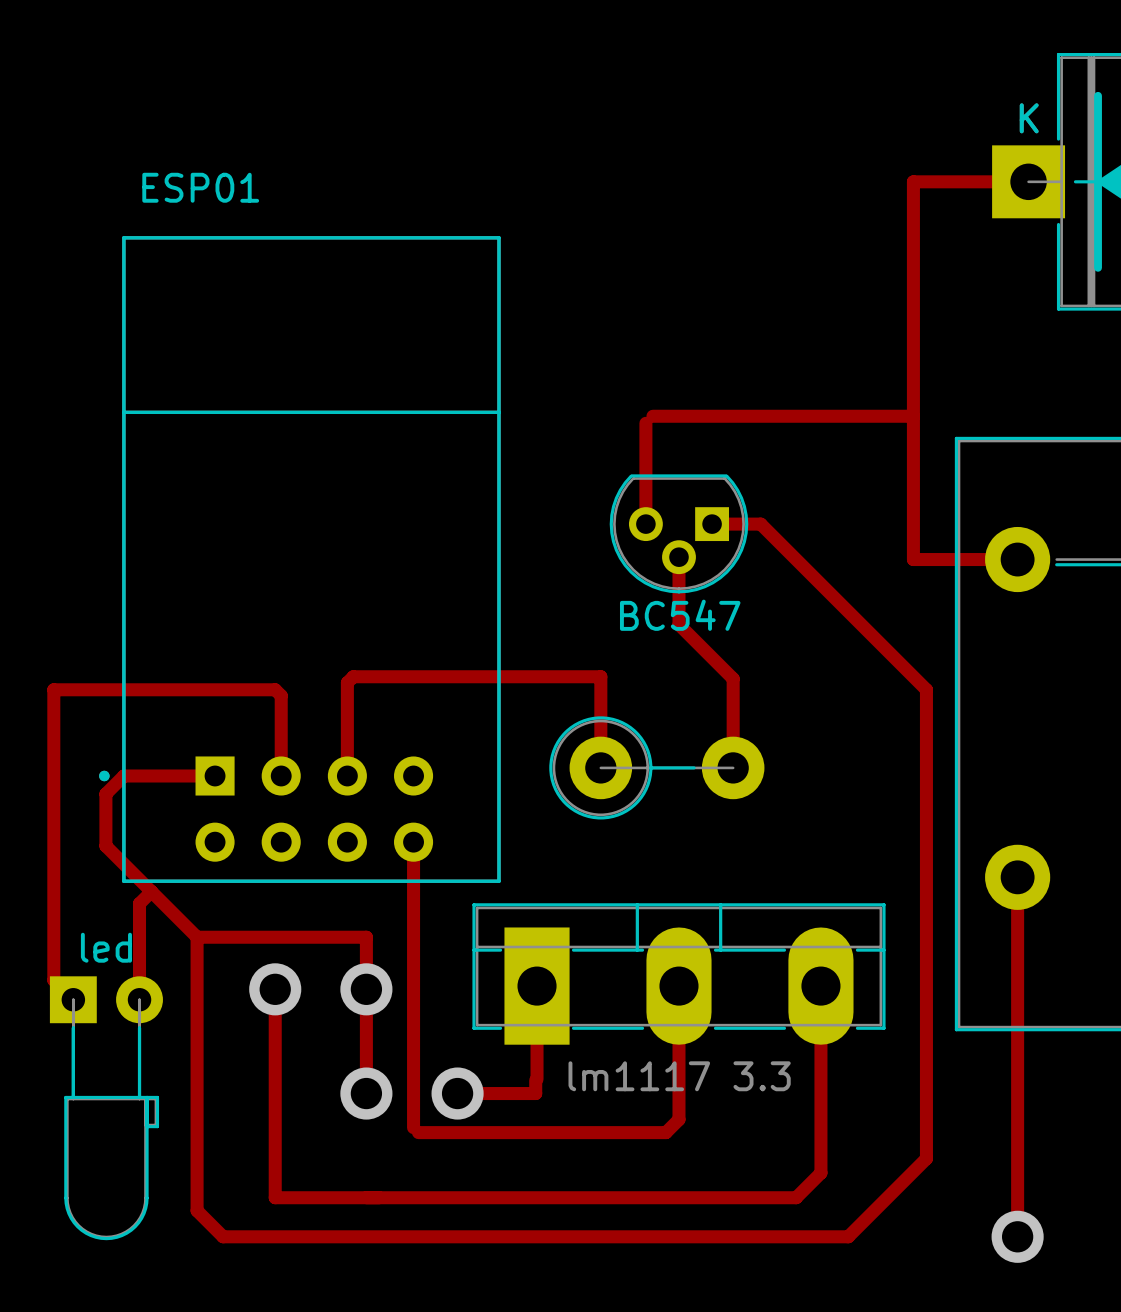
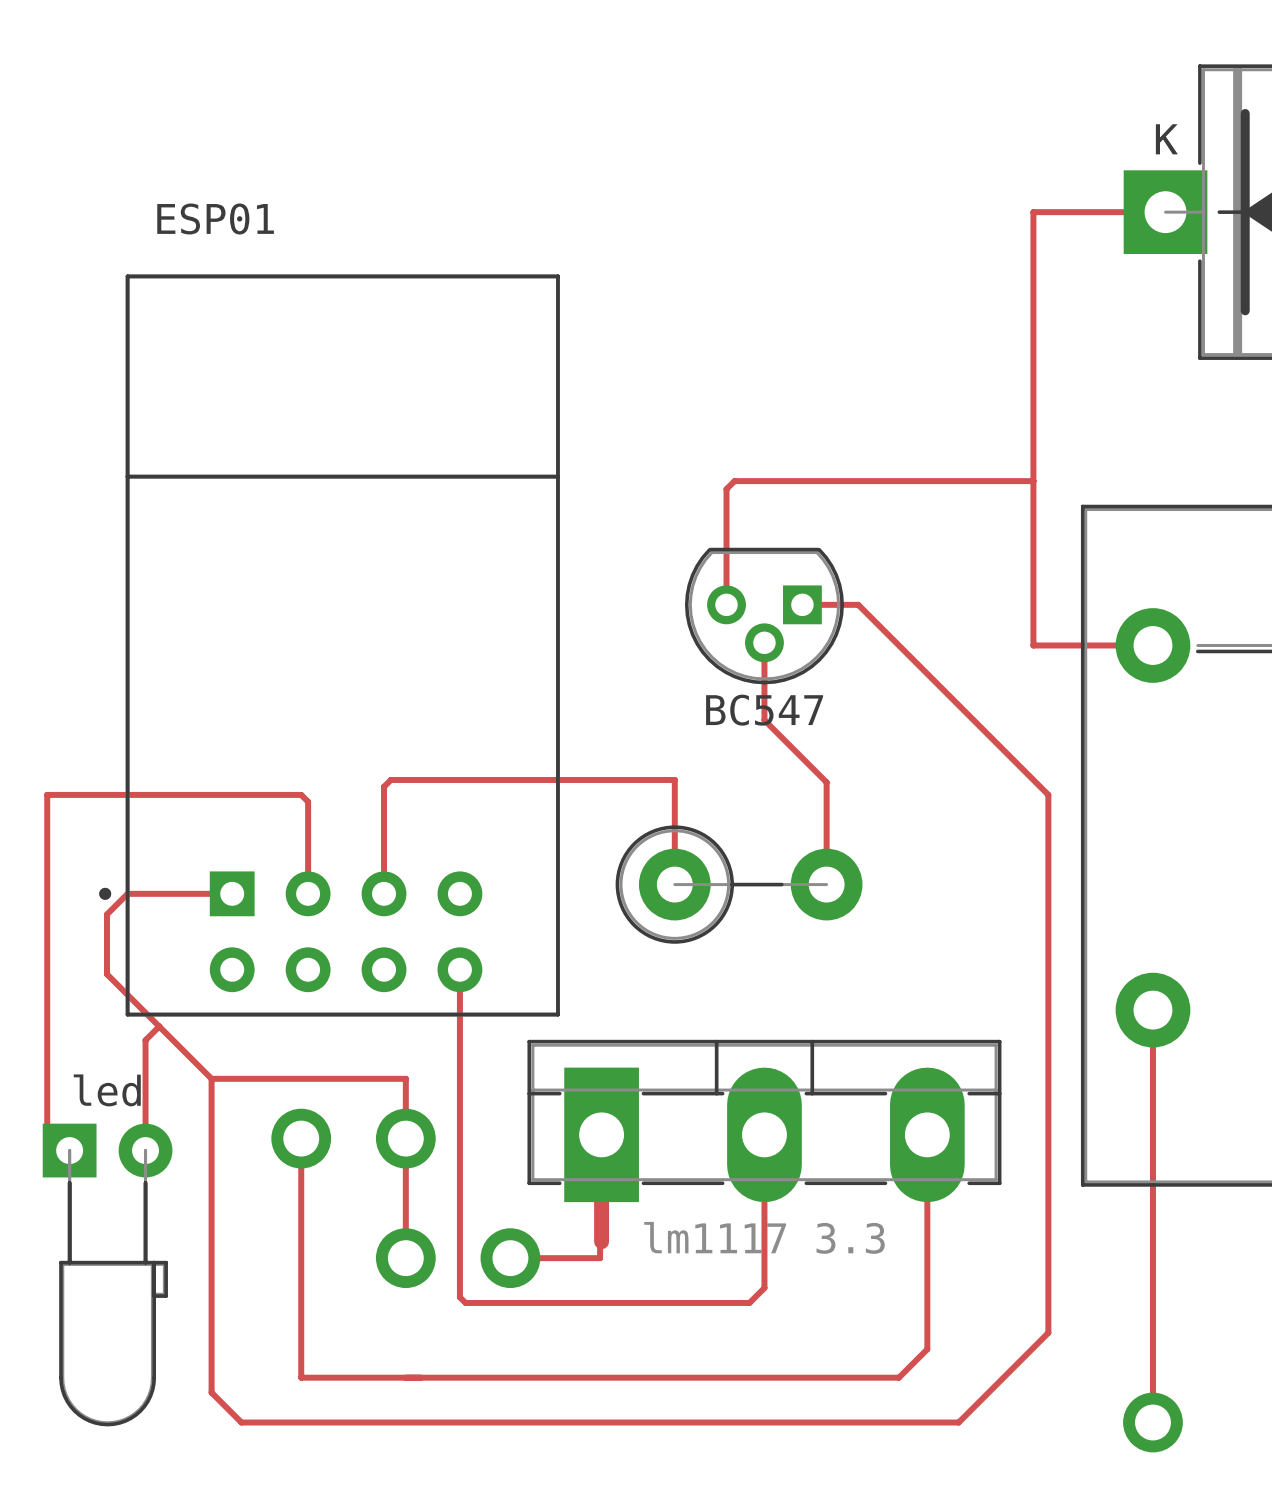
top track width: thick (1028, 181) (913, 181) (913, 559) (1017, 559) -> thin (1165, 212) (1033, 212) (1033, 645) (1152, 645)
top track width: thick (652, 416) (913, 416) -> thin (734, 481) (1033, 481)
top track width: thick (645, 423) (645, 524) -> thin (726, 489) (726, 604)
top track width: thick (712, 524) (760, 524) (926, 689) (926, 1158) (848, 1236) (223, 1236) (197, 1210) (197, 937) -> thin (802, 604) (858, 604) (1048, 794) (1048, 1332) (958, 1422) (241, 1422) (211, 1392) (211, 1078)
top track width: thick (678, 557) (678, 624) (733, 678) (733, 767) -> thin (764, 642) (764, 720) (826, 782) (826, 884)
top track width: thick (600, 767) (600, 676) (353, 676) (347, 682) (347, 775) -> thin (674, 884) (674, 779) (390, 779) (384, 786) (384, 893)
top track width: thick (215, 775) (123, 775) (105, 793) (105, 846) (197, 937) -> thin (232, 893) (127, 893) (106, 914) (106, 974) (211, 1078)
top track width: thick (281, 775) (281, 695) (275, 689) (53, 689) (53, 980) (73, 999) -> thin (308, 893) (308, 801) (301, 794) (47, 794) (47, 1128) (69, 1150)
top track width: thick (413, 842) (413, 1127) -> thin (459, 969) (459, 1297)
top track width: thick (1017, 877) (1017, 1236) -> thin (1152, 1010) (1152, 1422)
top track width: thick (151, 891) (139, 903) (139, 999) -> thin (159, 1026) (145, 1040) (145, 1150)
top track width: thick (197, 937) (366, 937) (366, 1093) -> thin (211, 1078) (405, 1078) (405, 1258)
top track width: thick (678, 986) (678, 1119) (665, 1132) (418, 1132) -> thin (764, 1134) (764, 1288) (749, 1302) (465, 1302)
top track width: thick (820, 986) (820, 1172) (796, 1197) (275, 1197) (275, 1002) -> thin (927, 1134) (927, 1349) (898, 1377) (301, 1377) (301, 1153)
top track width: thick (535, 1080) (535, 1093) (457, 1093) -> thin (600, 1243) (600, 1258) (510, 1258)

